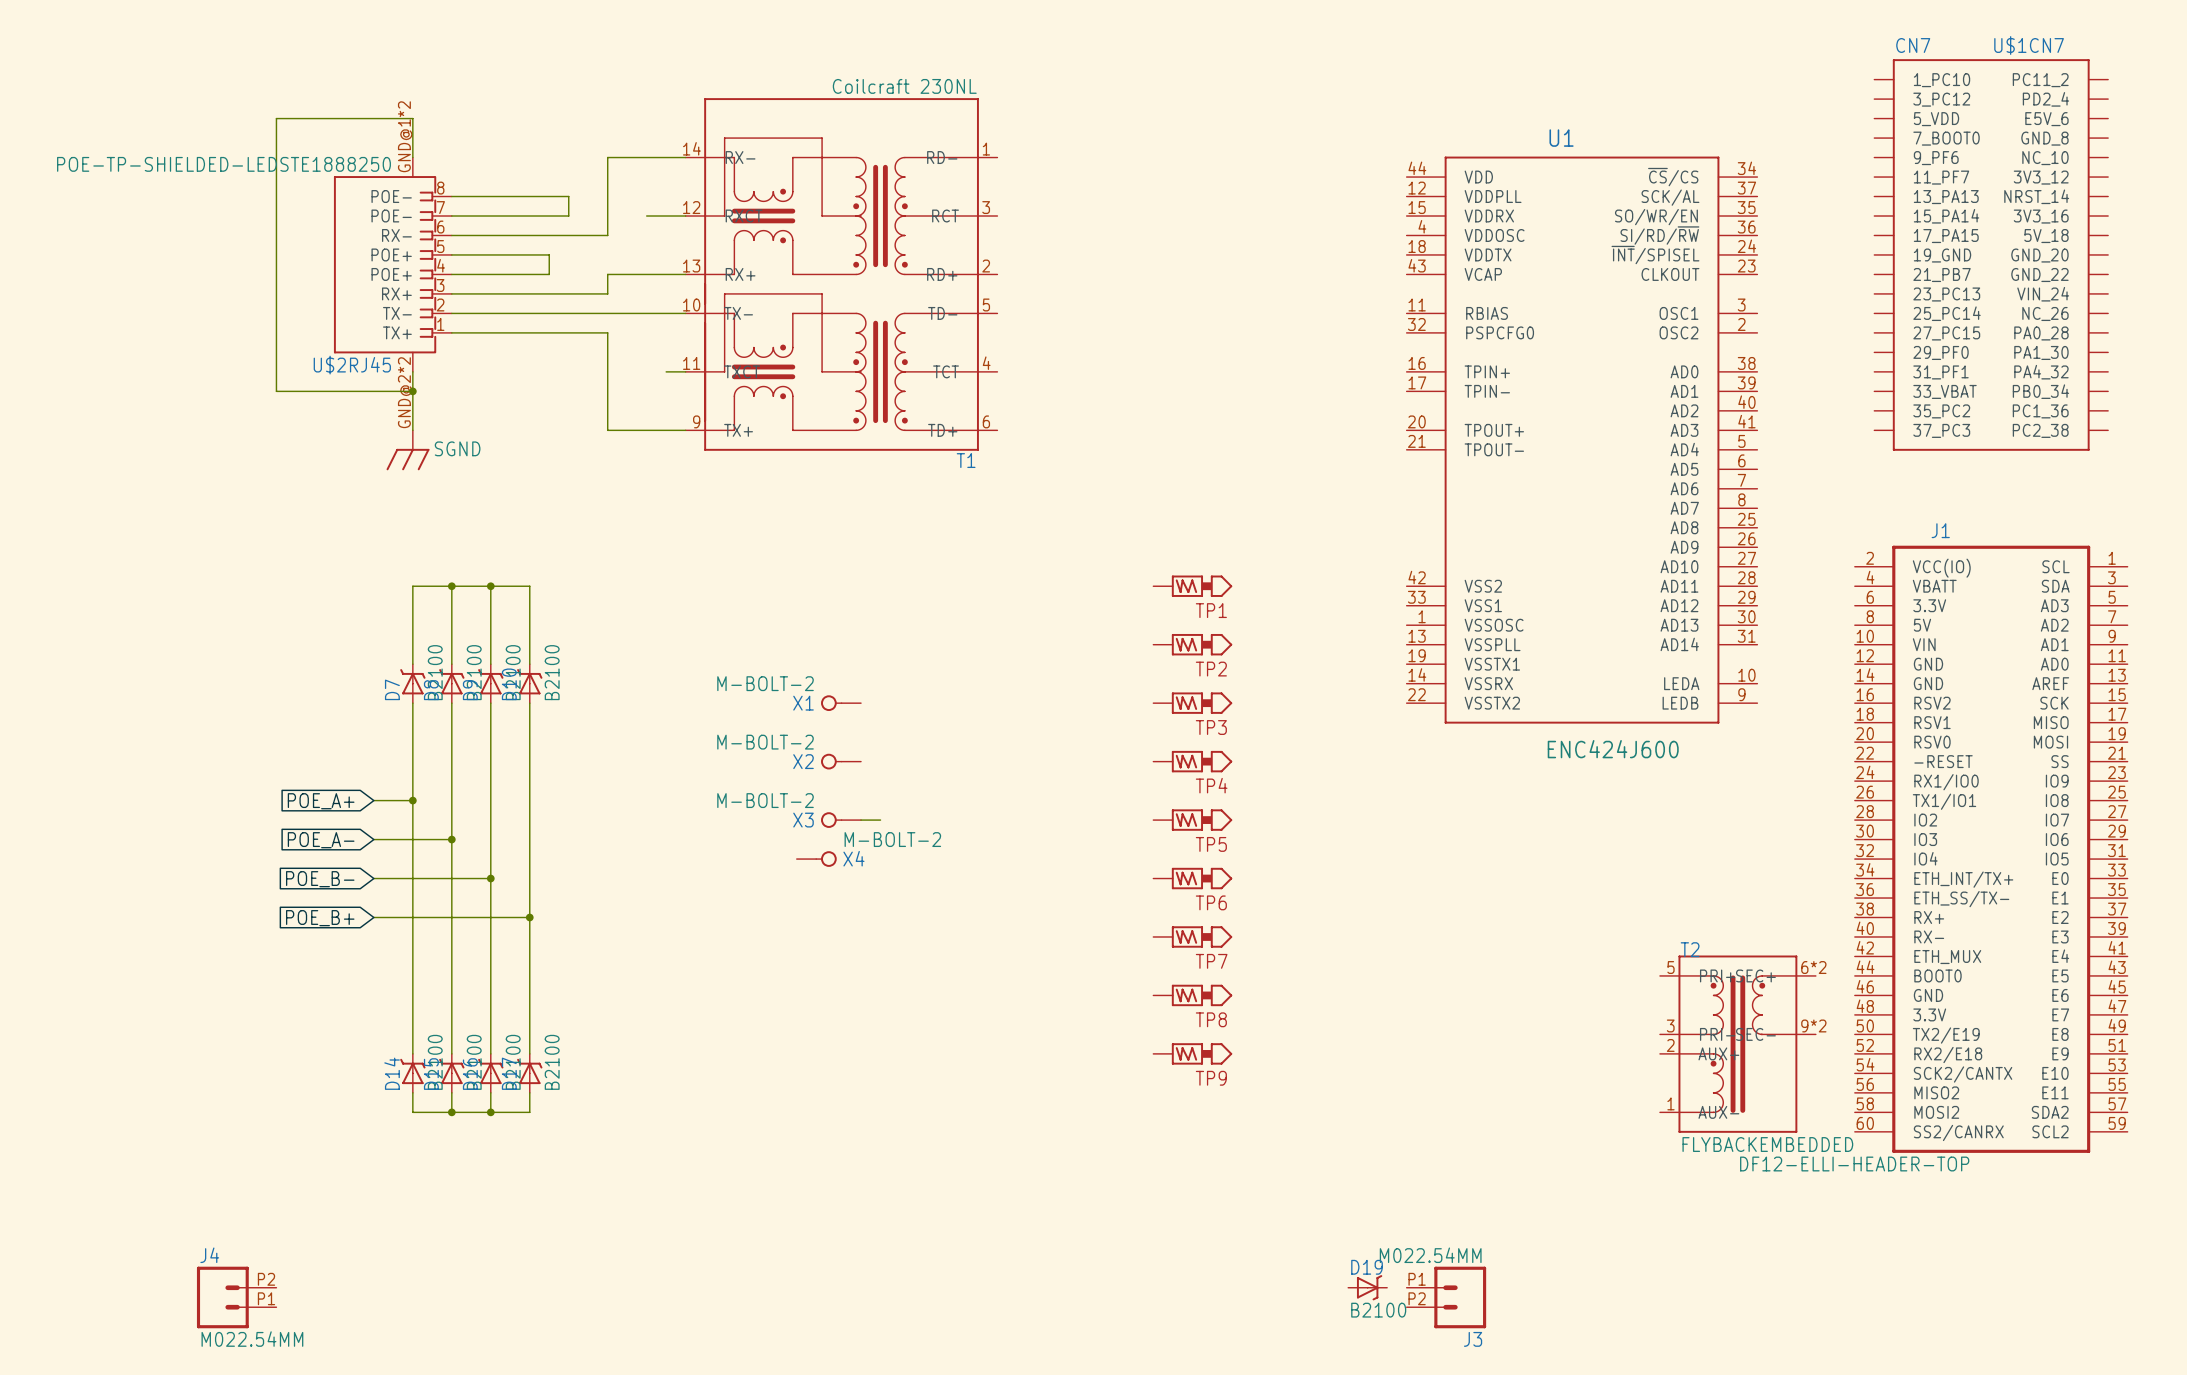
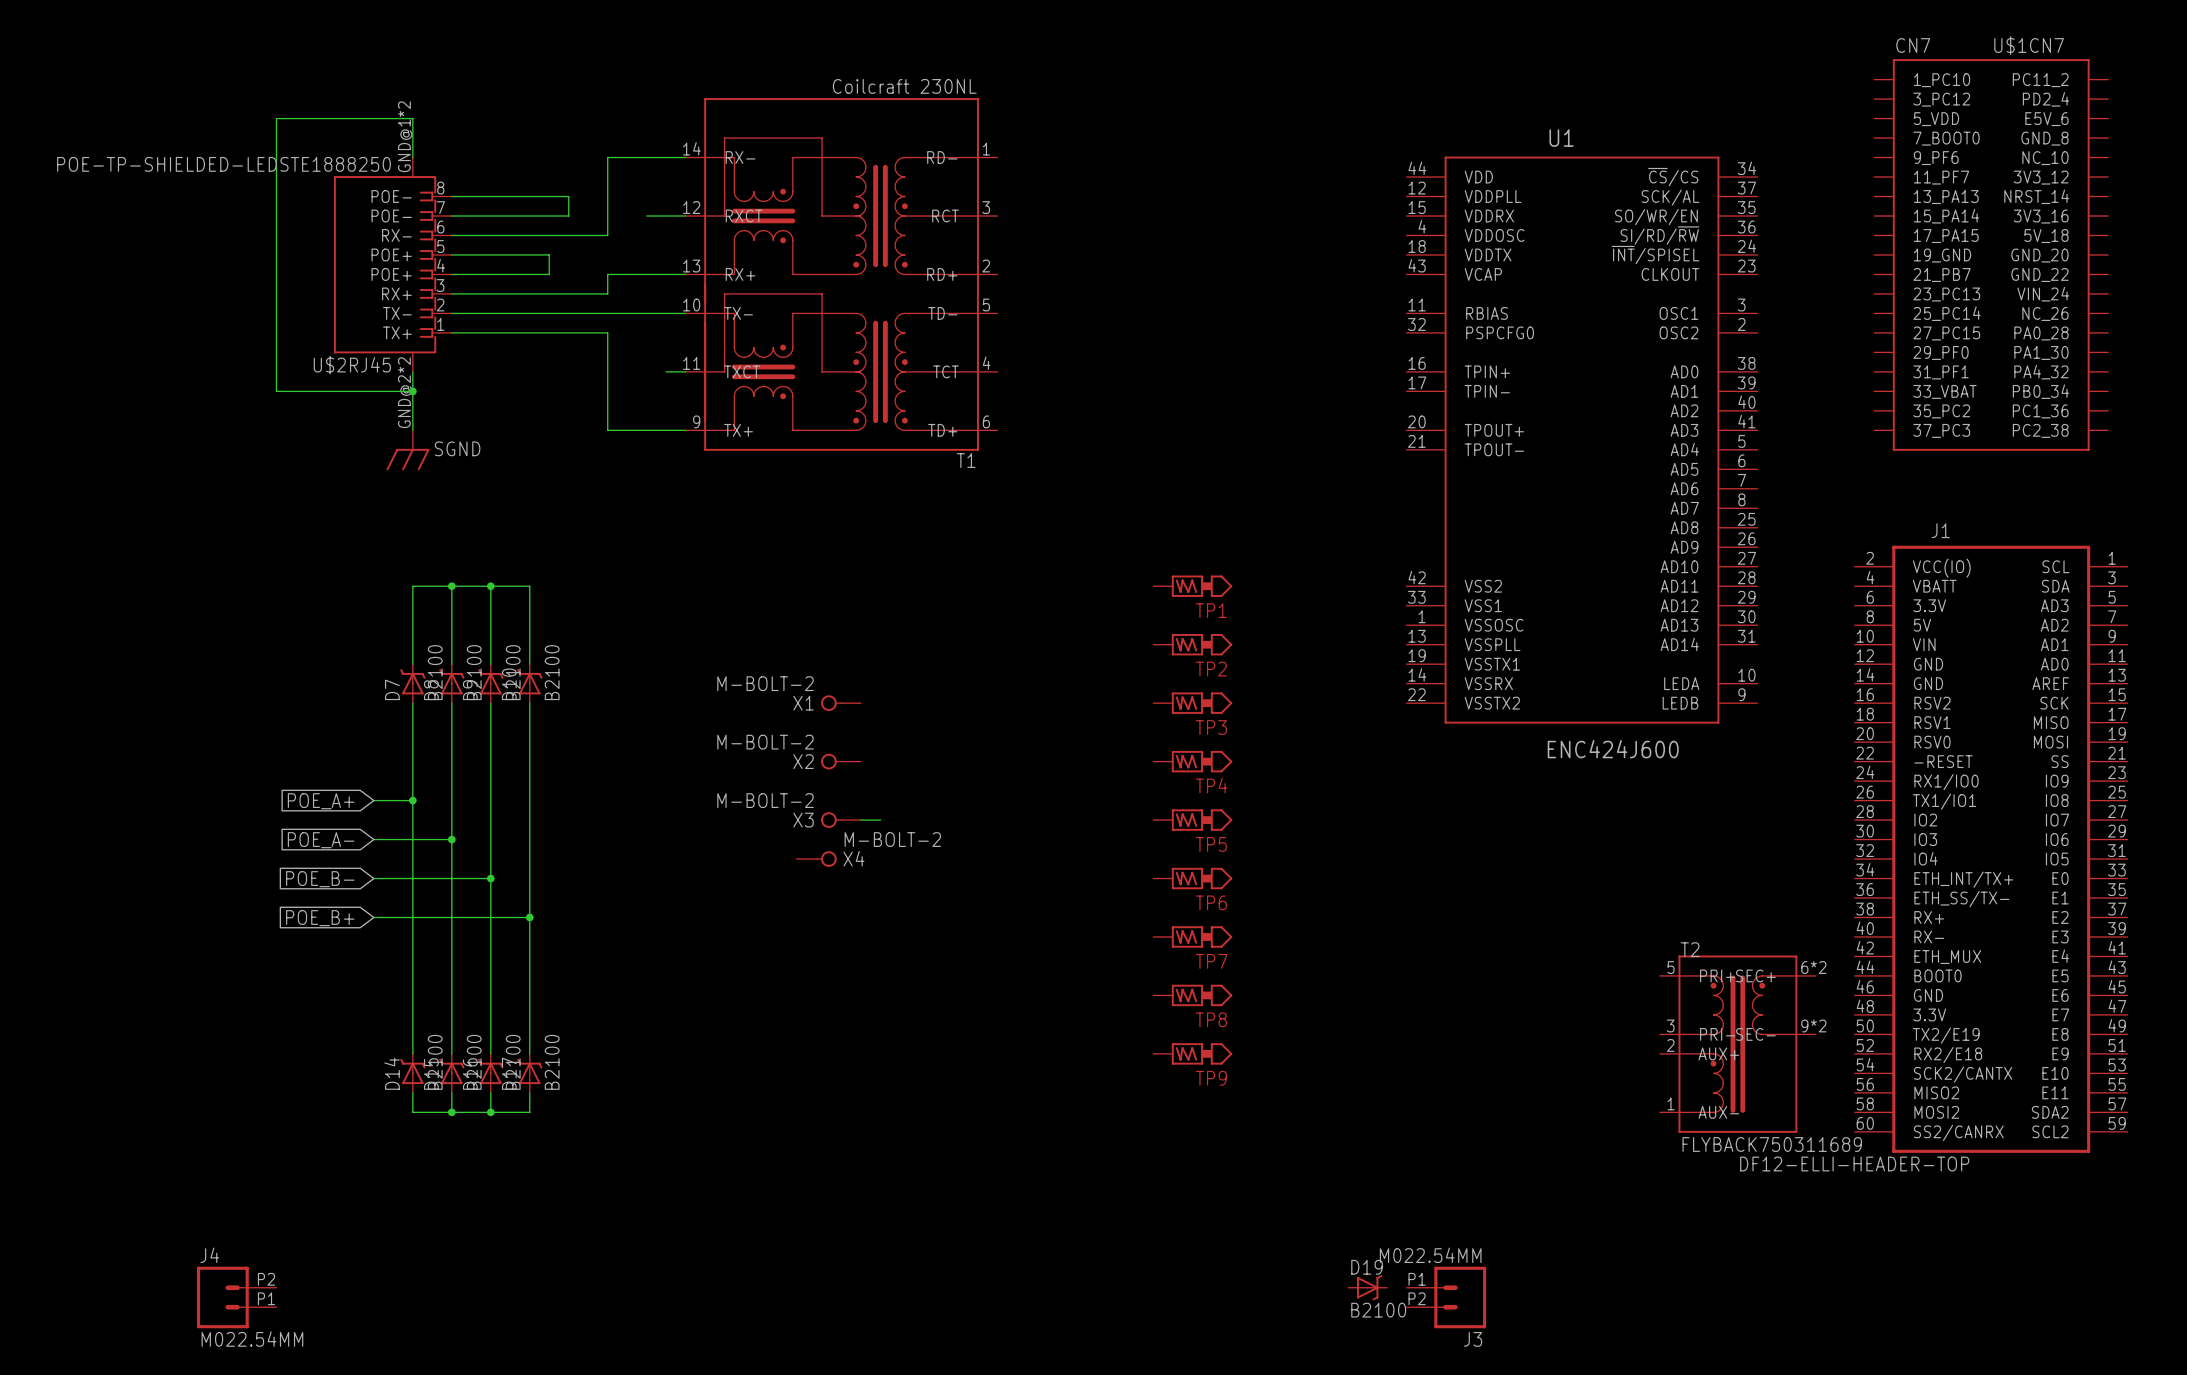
T2 value: FLYBACKEMBEDDED (1767, 1144) -> FLYBACK750311689 (1772, 1144)

